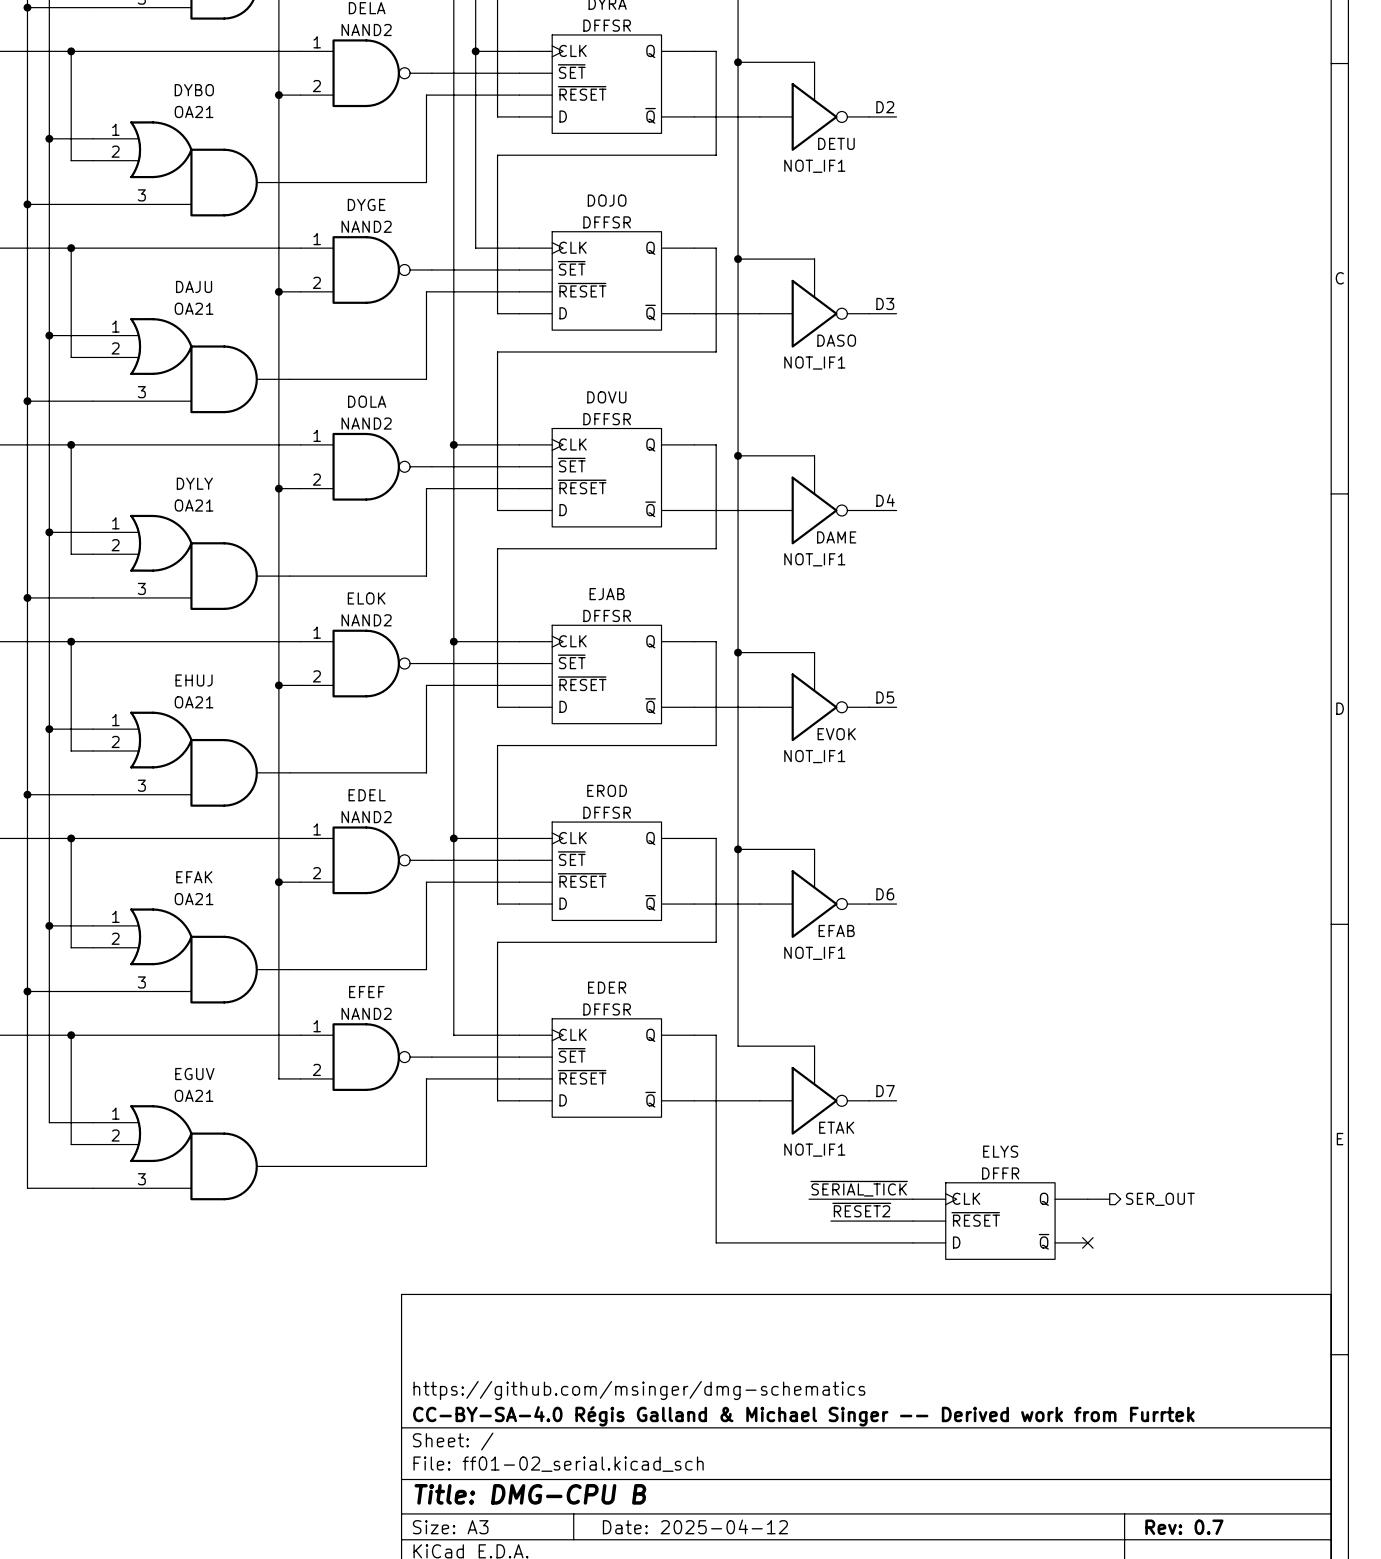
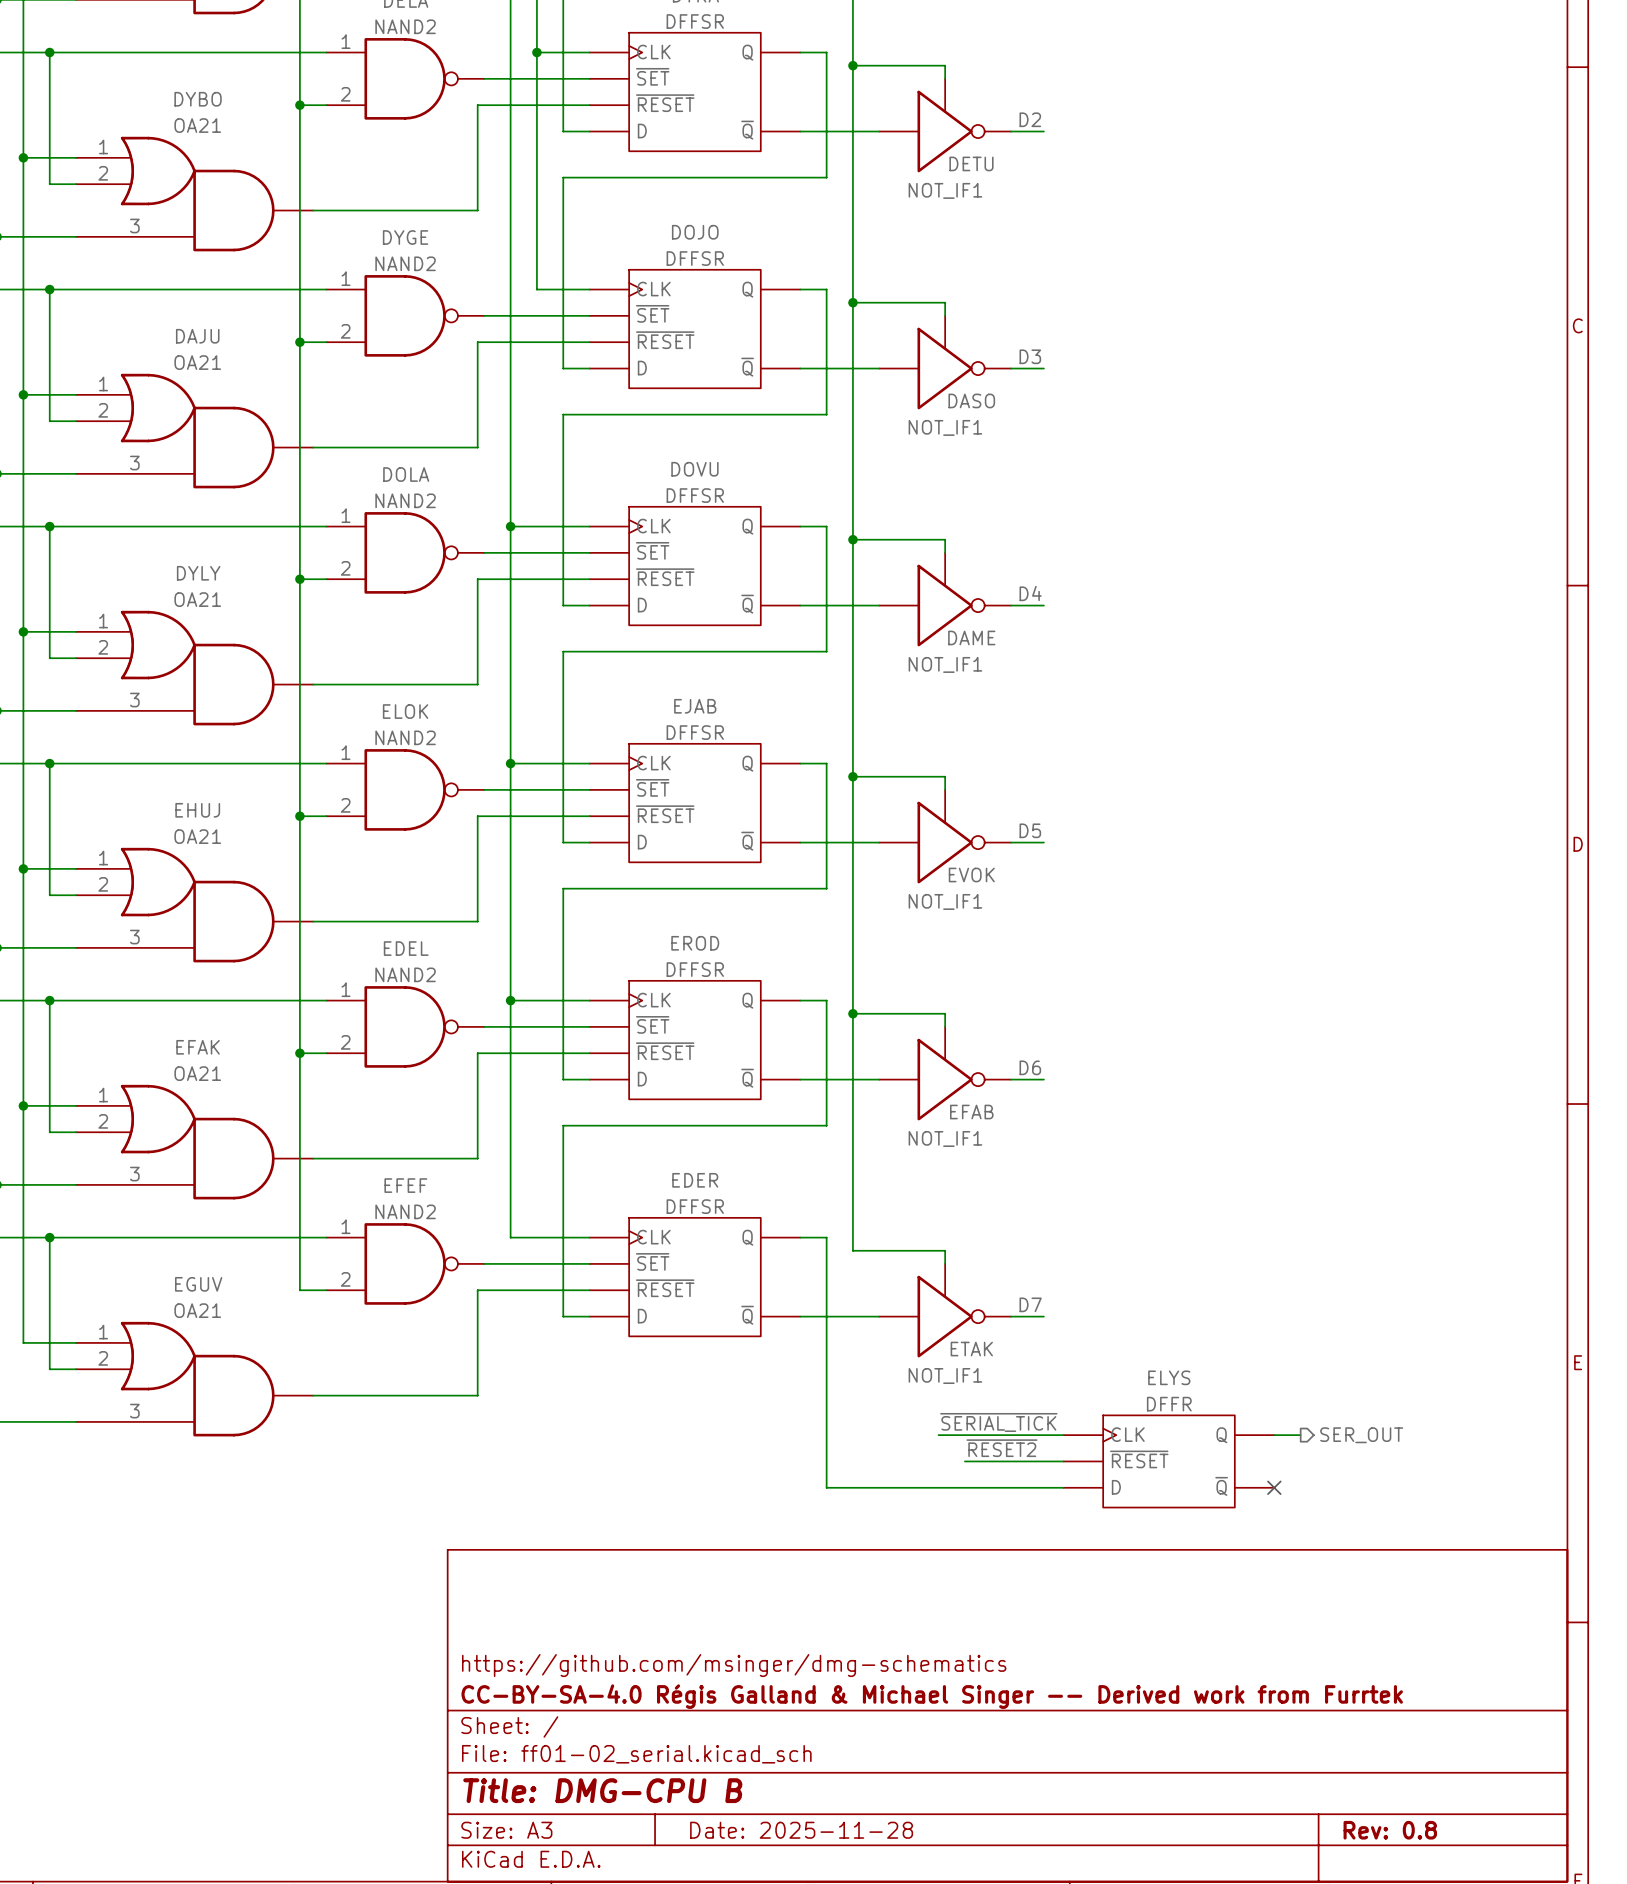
title block: Date: 2025-04-12 (695, 1526) -> Date: 2025-11-28 (801, 1830)
title block: Rev: 0.7 (1184, 1527) -> Rev: 0.8 (1390, 1830)

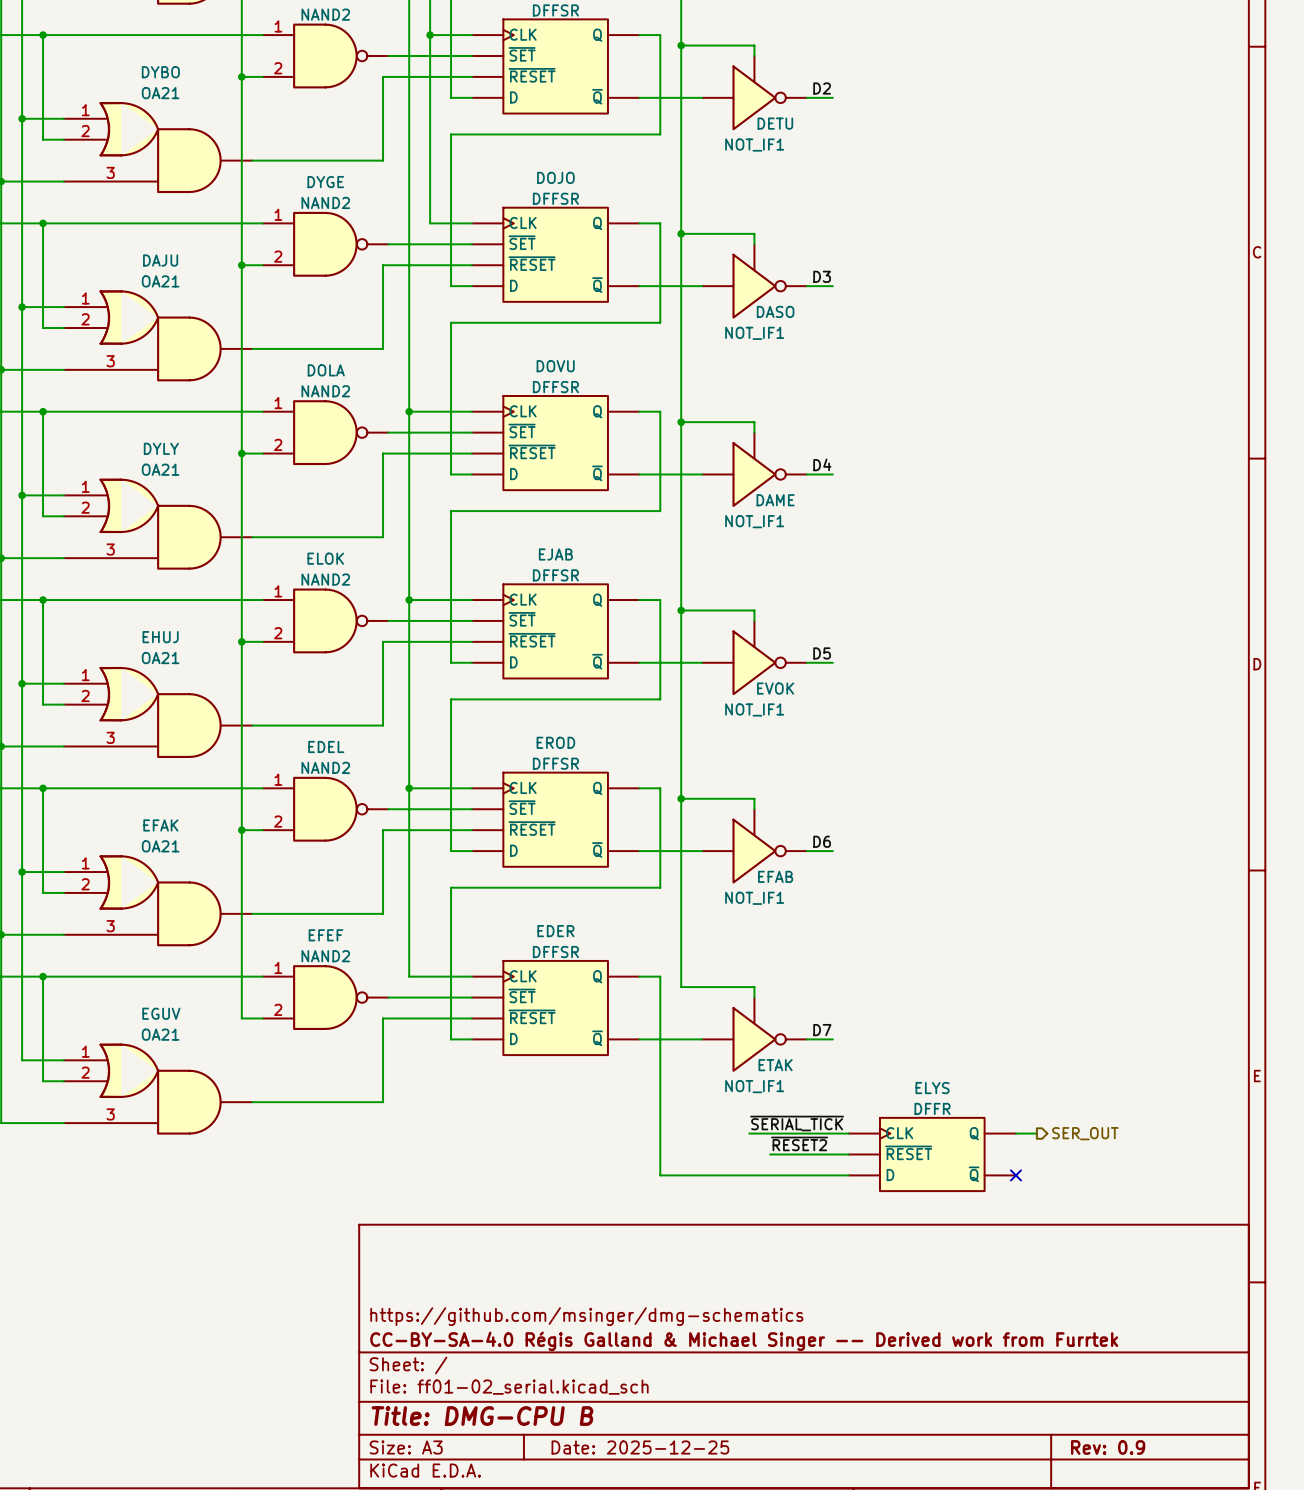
title block: Date: 2025-11-28 (801, 1830) -> Date: 2025-12-25 (640, 1447)
title block: Rev: 0.8 (1390, 1830) -> Rev: 0.9 (1108, 1447)

